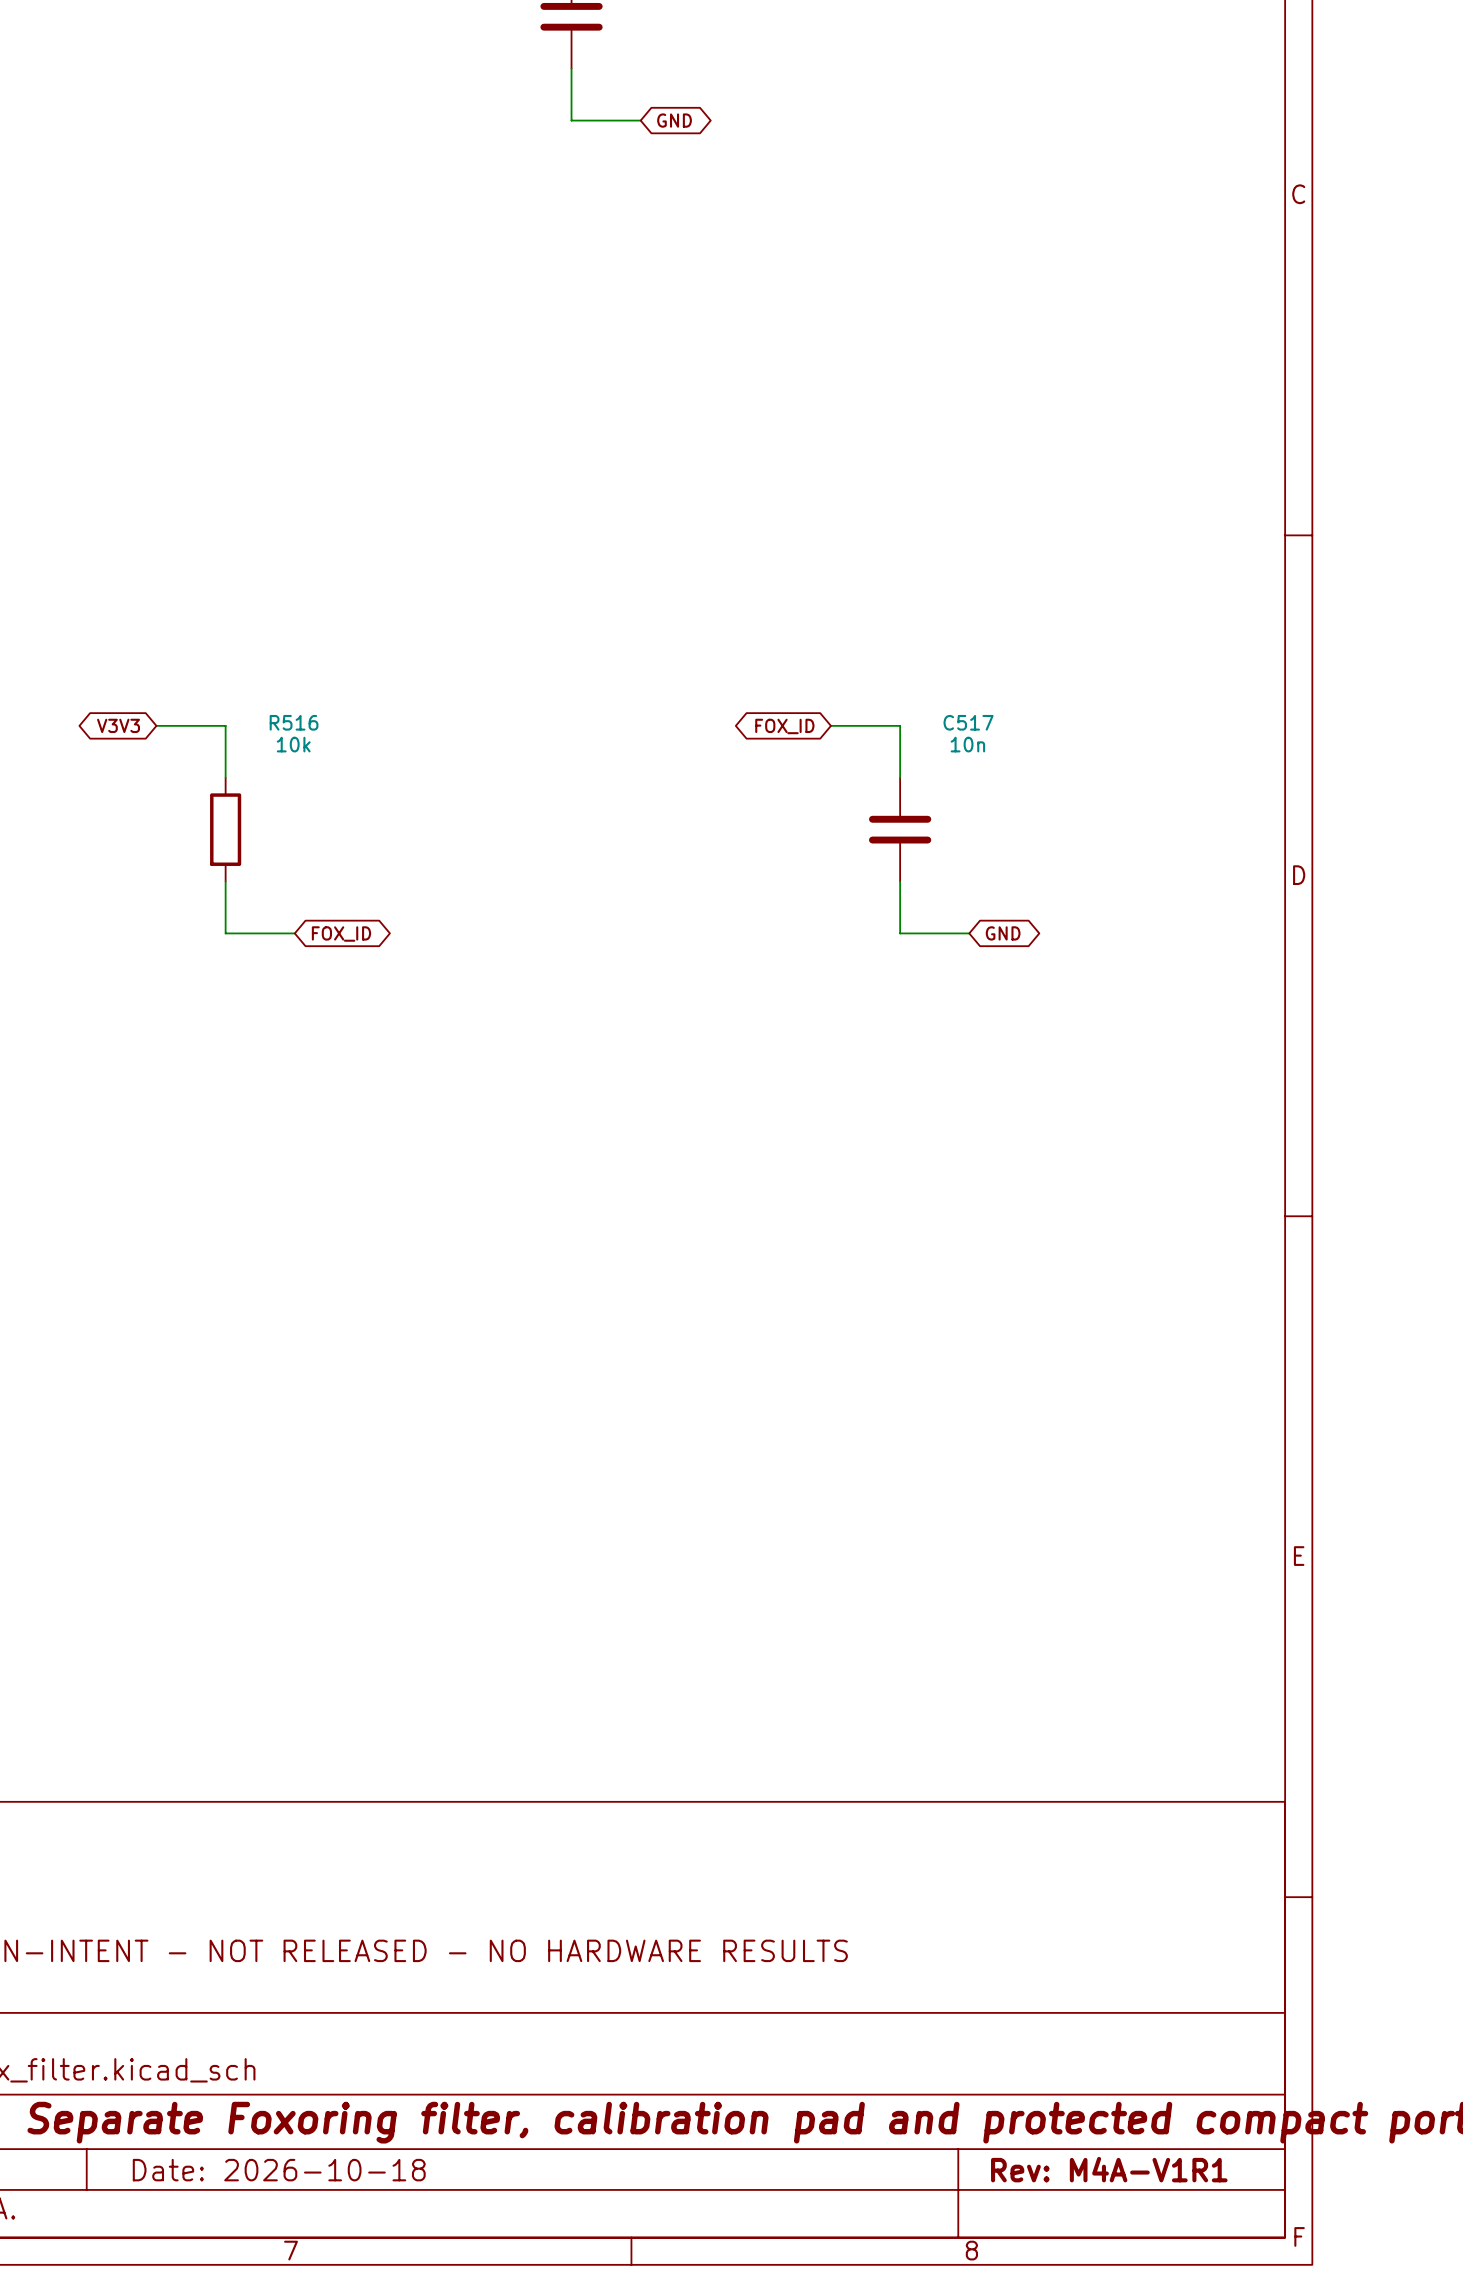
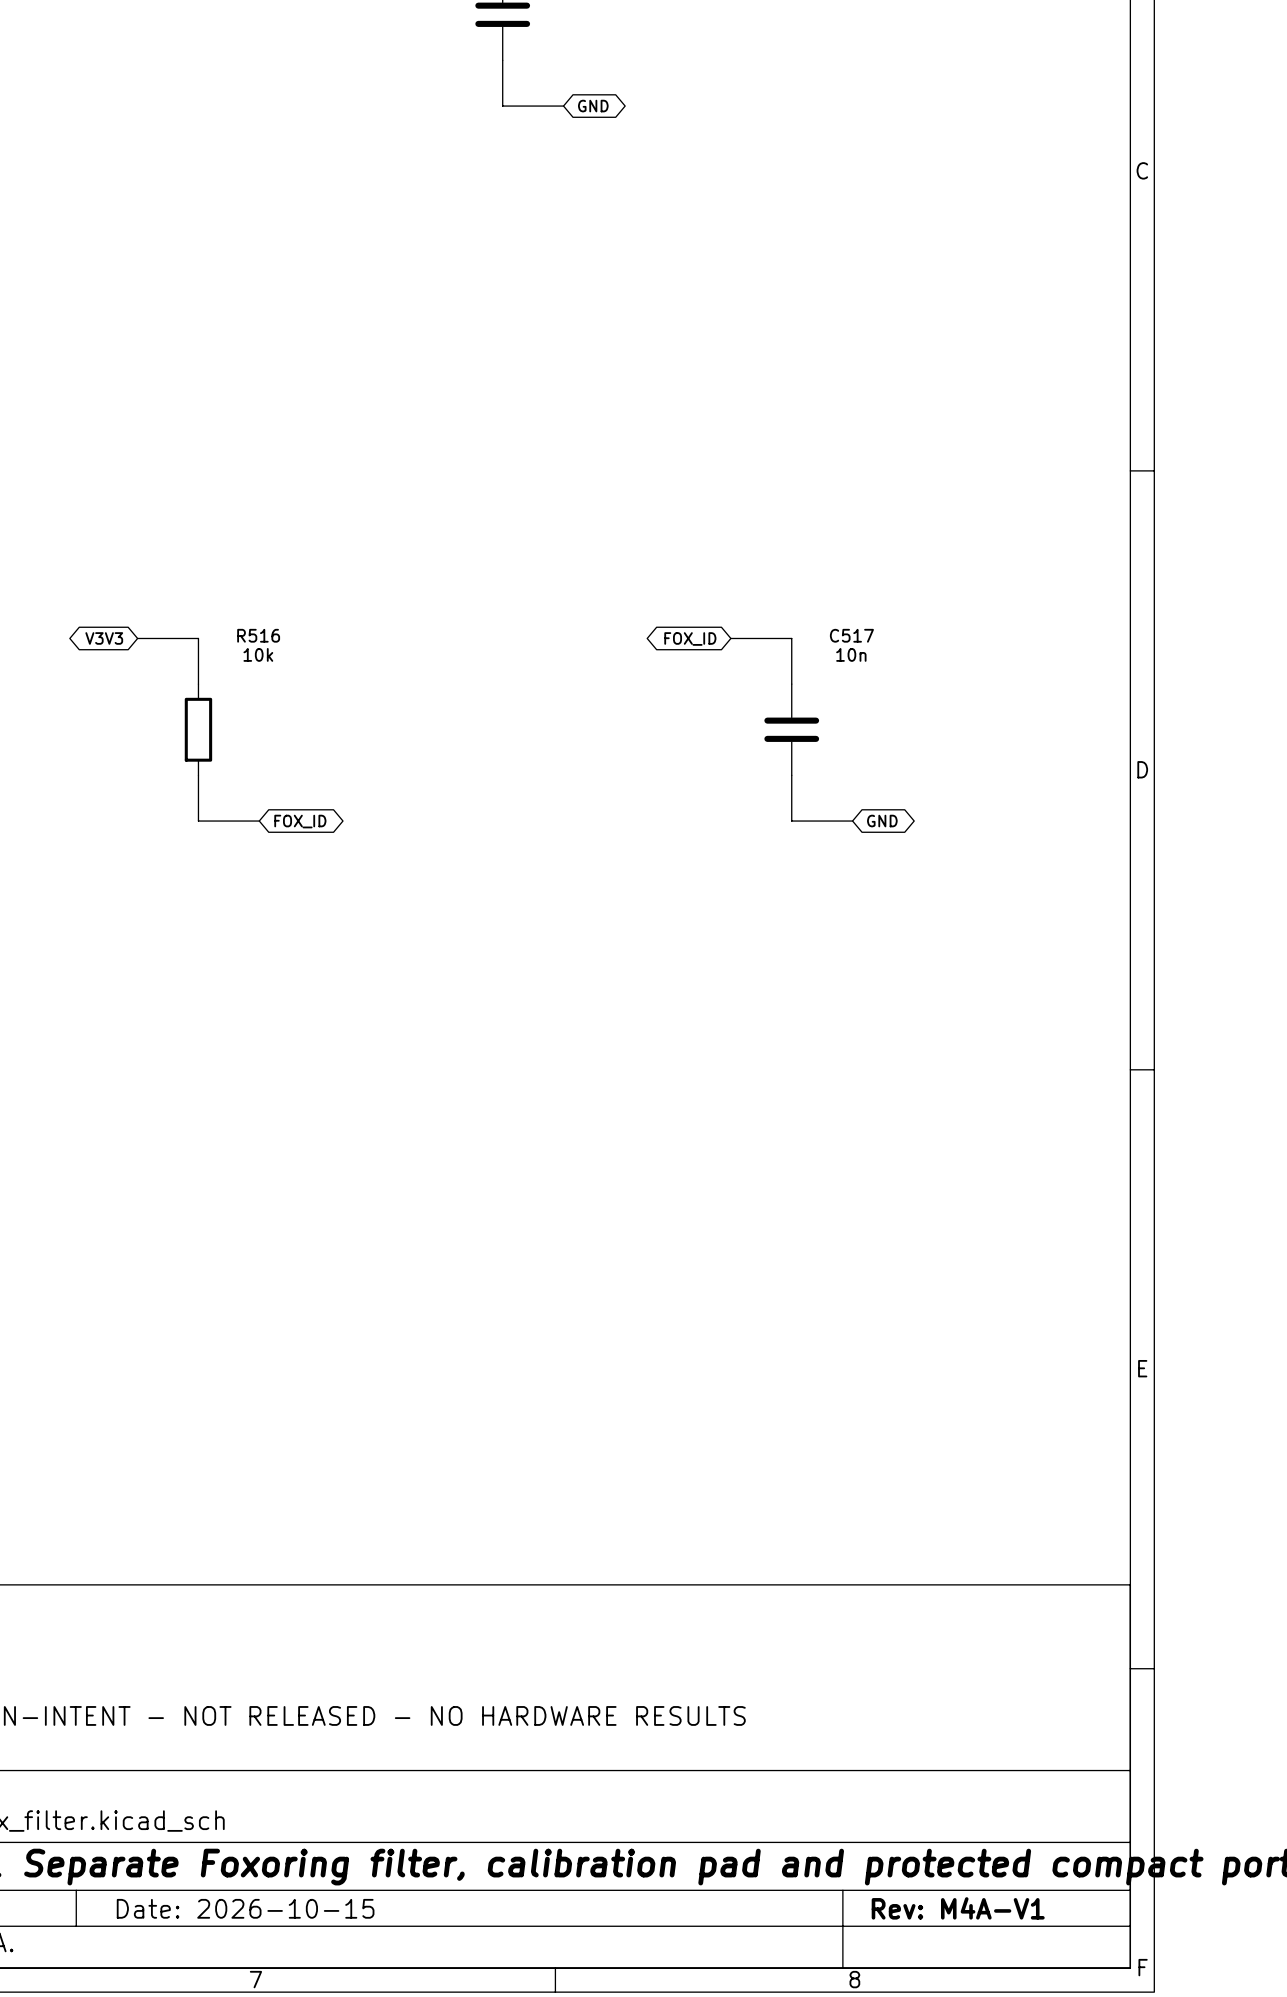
title block: Rev: M4A-V1R1 (1109, 2169) -> Rev: M4A-V1 (958, 1908)
title block: Date: 2026-10-18 (279, 2170) -> Date: 2026-10-15 (245, 1908)

